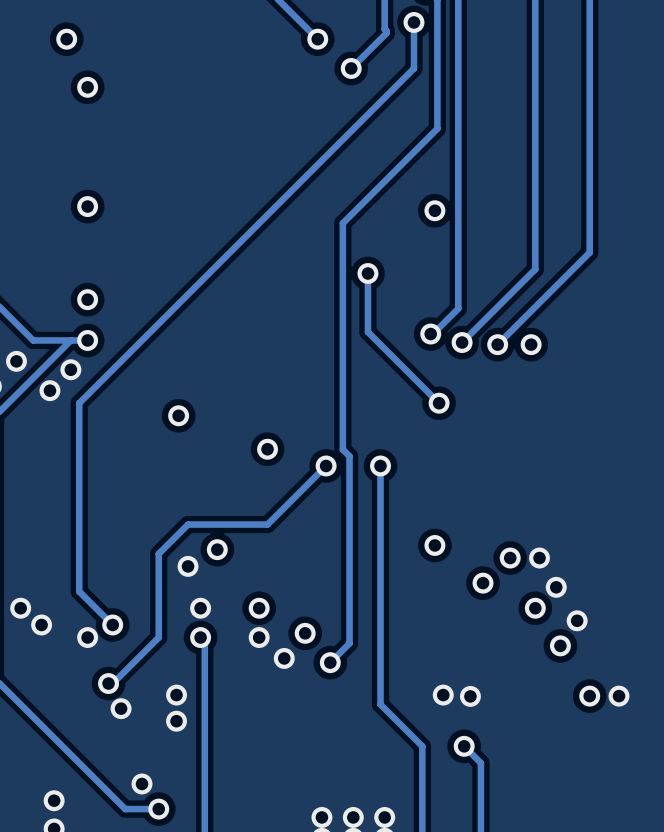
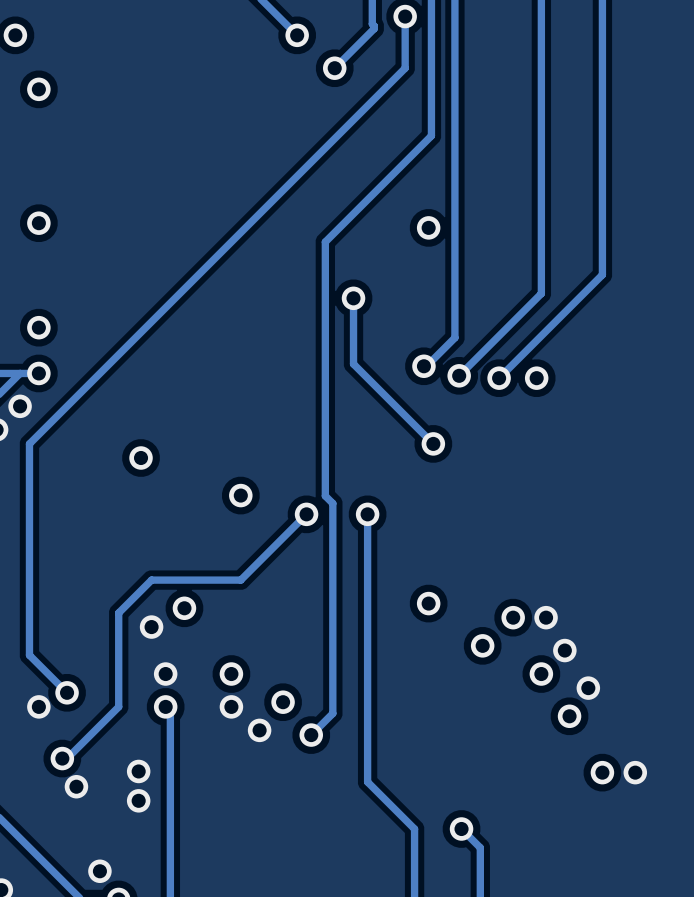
via: (443, 695) -> none
via: (470, 696) -> none

